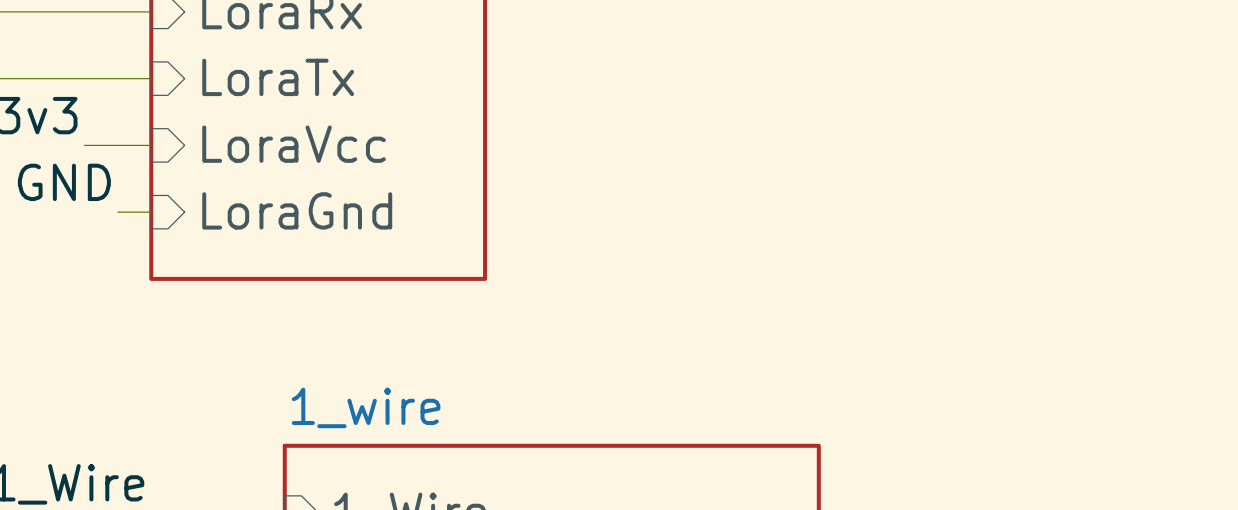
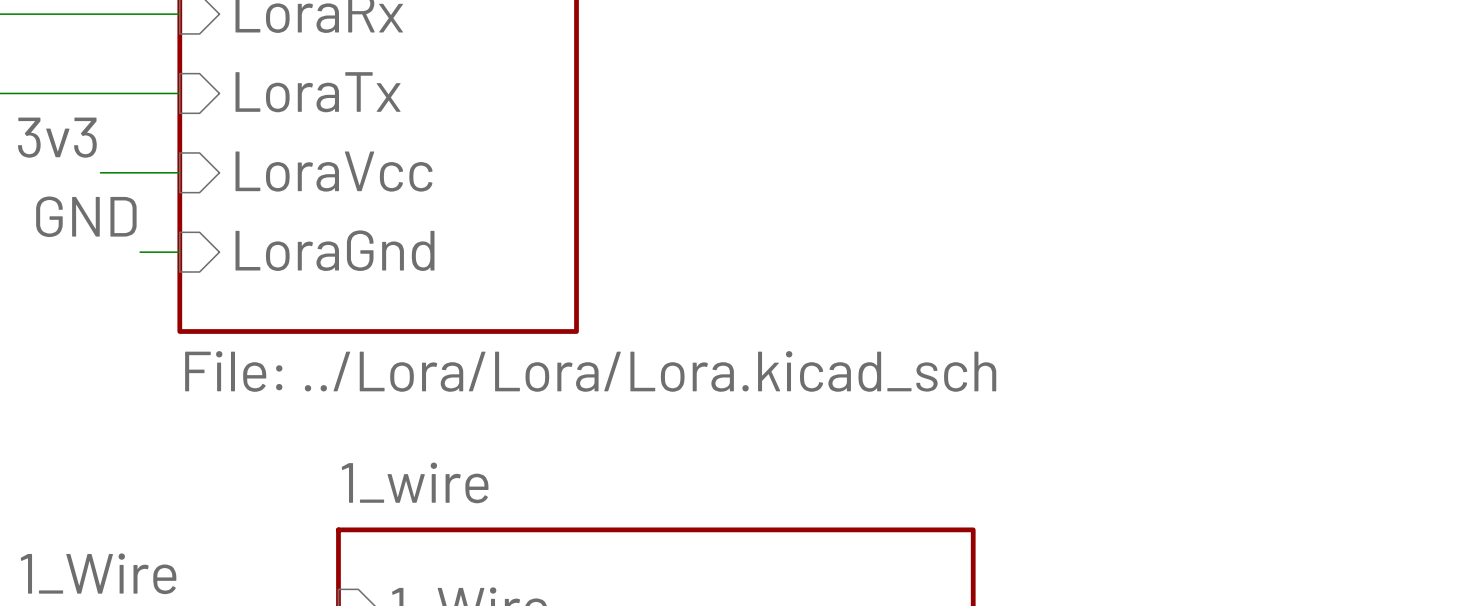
sheet value: none -> File: ../Lora/Lora/Lora.kicad_sch (590, 371)

